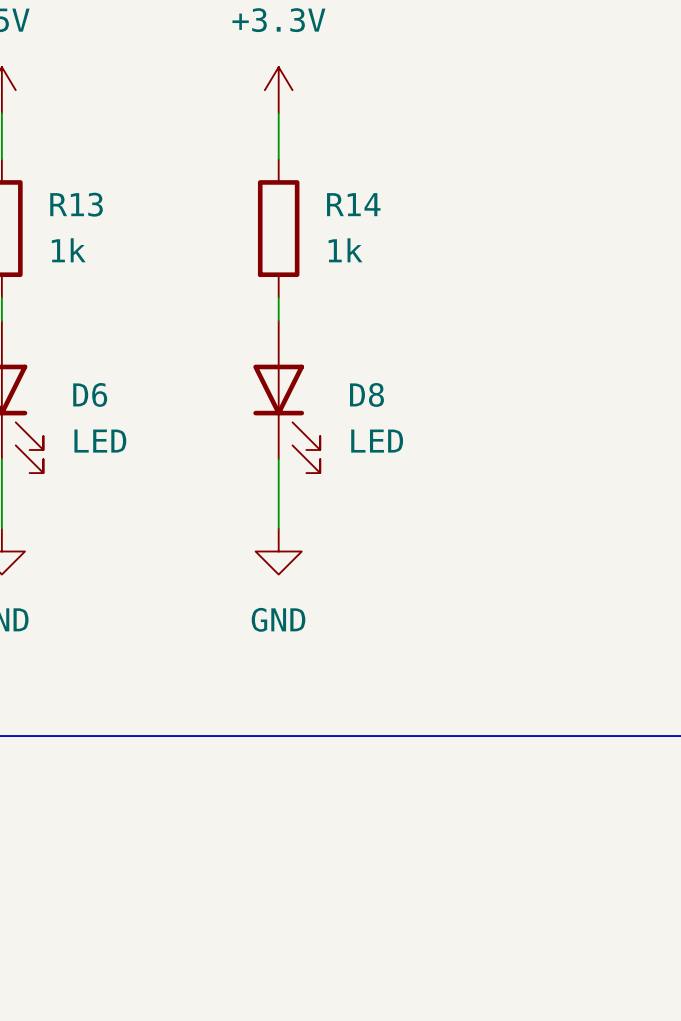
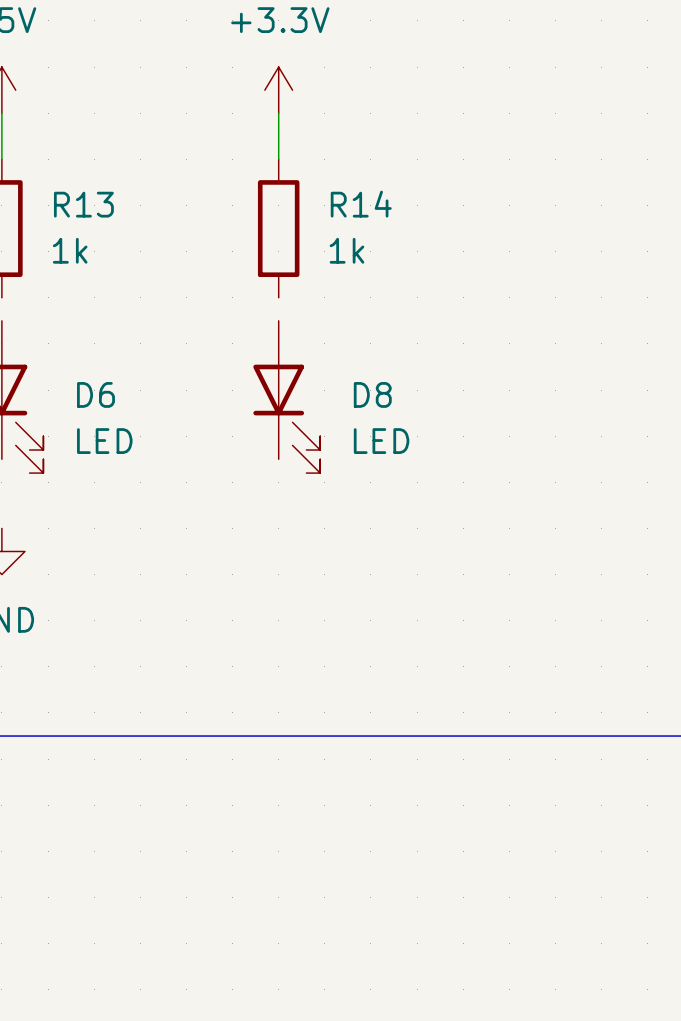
wire: (1, 297) (1, 320) -> none
wire: (278, 297) (278, 320) -> none
wire: (1, 459) (1, 528) -> none
wire: (278, 459) (278, 528) -> none
power symbol: GND (278, 551) -> none

